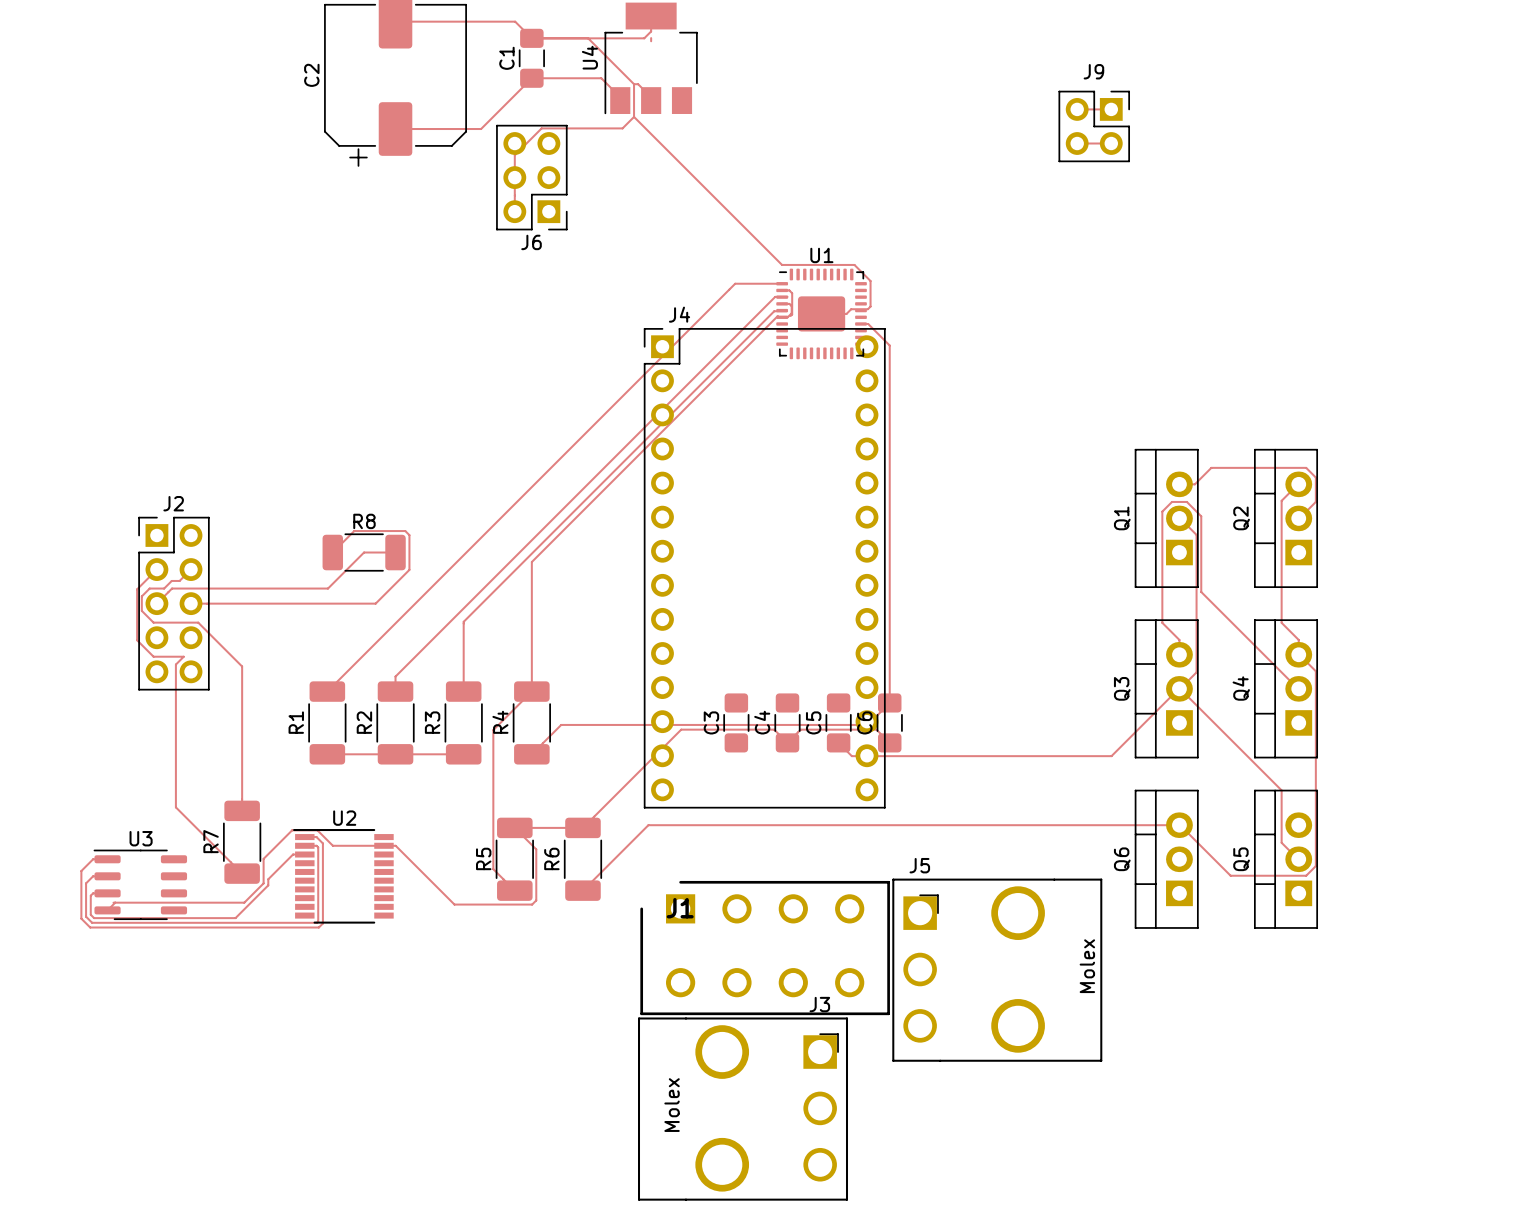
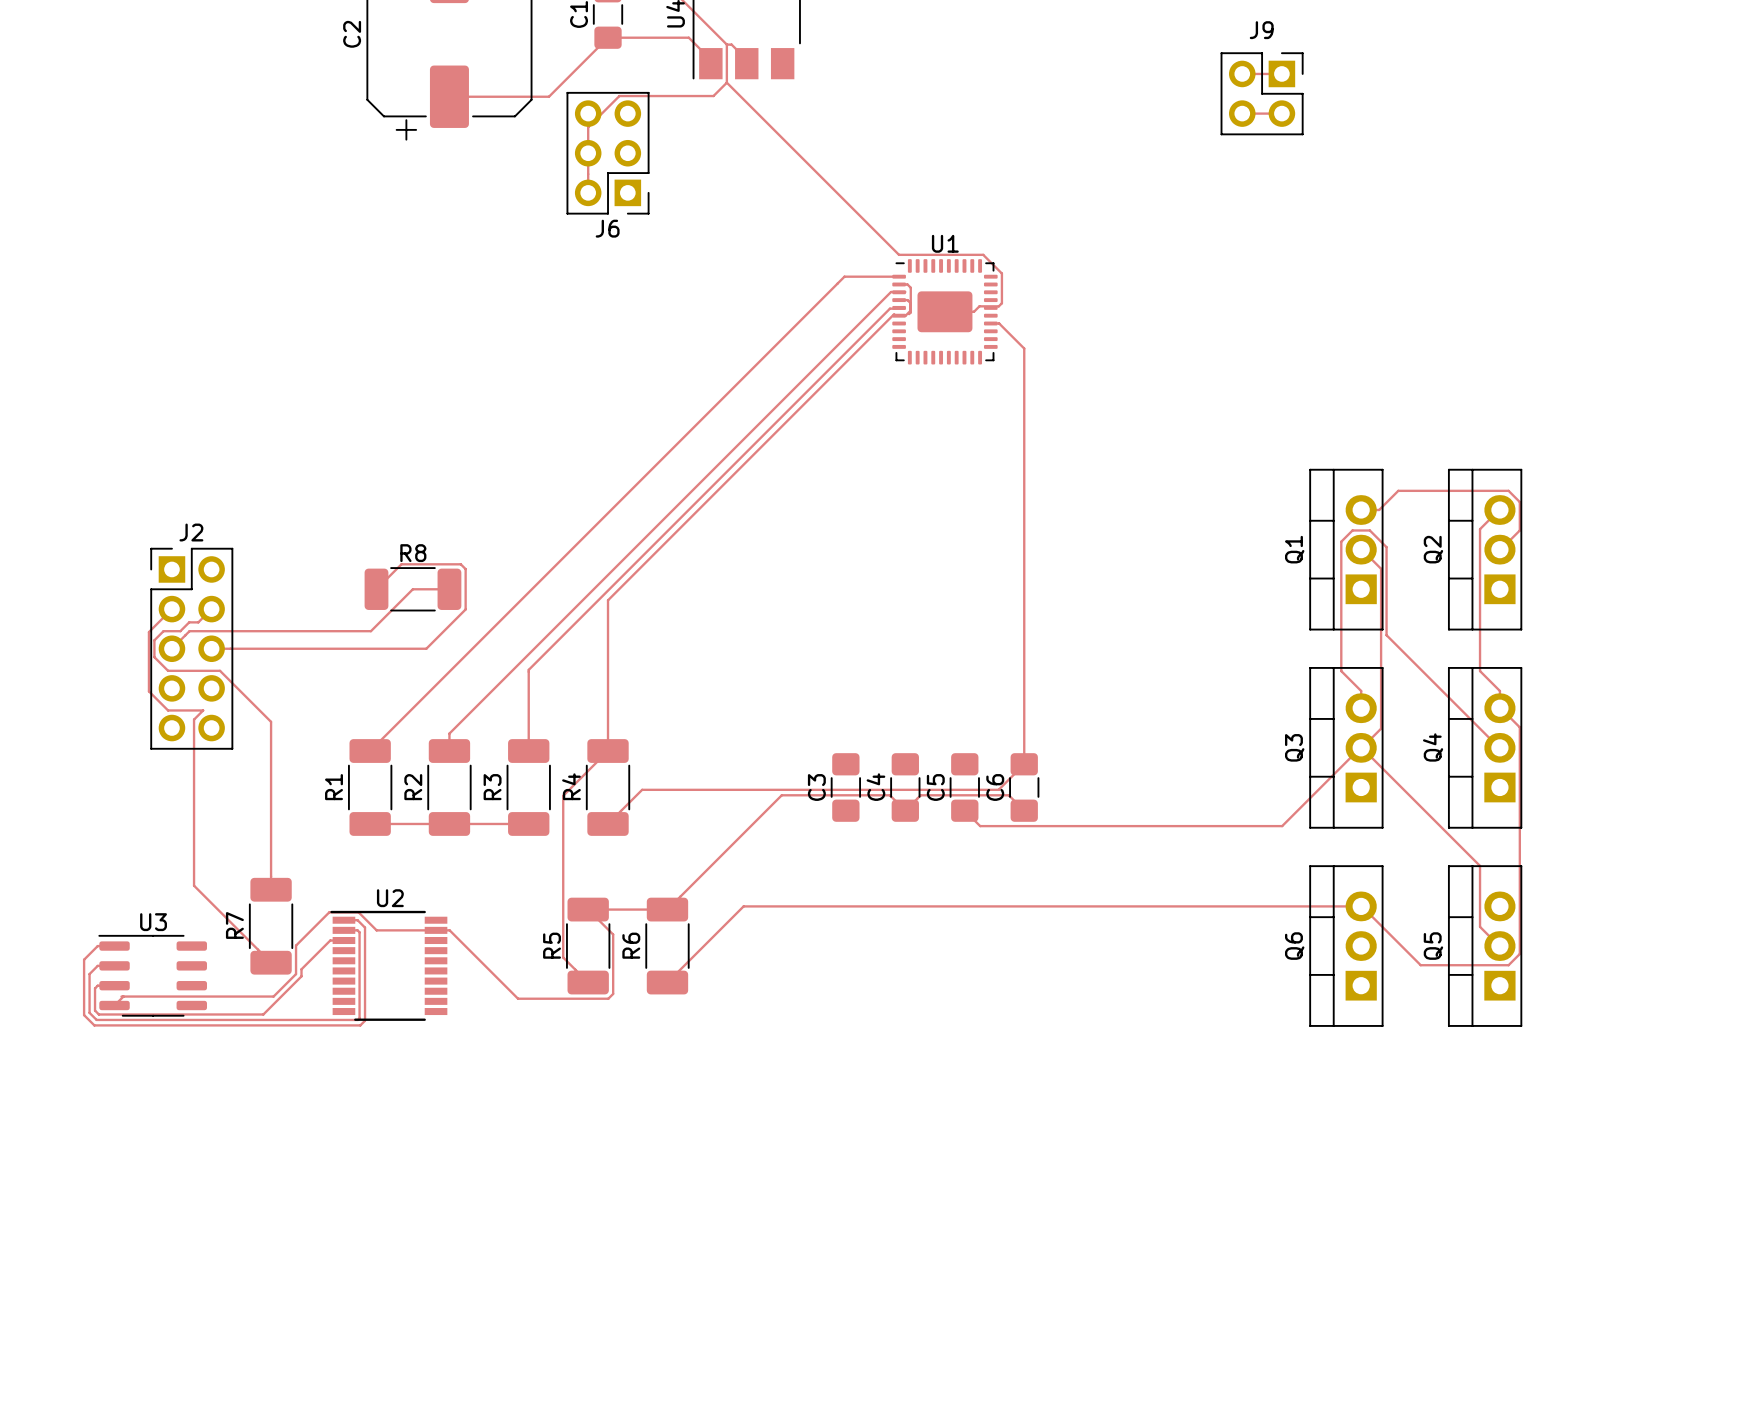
J4: (764, 568) -> none
J1: (765, 948) -> none
J5: (997, 970) -> none
J3: (743, 1109) -> none

